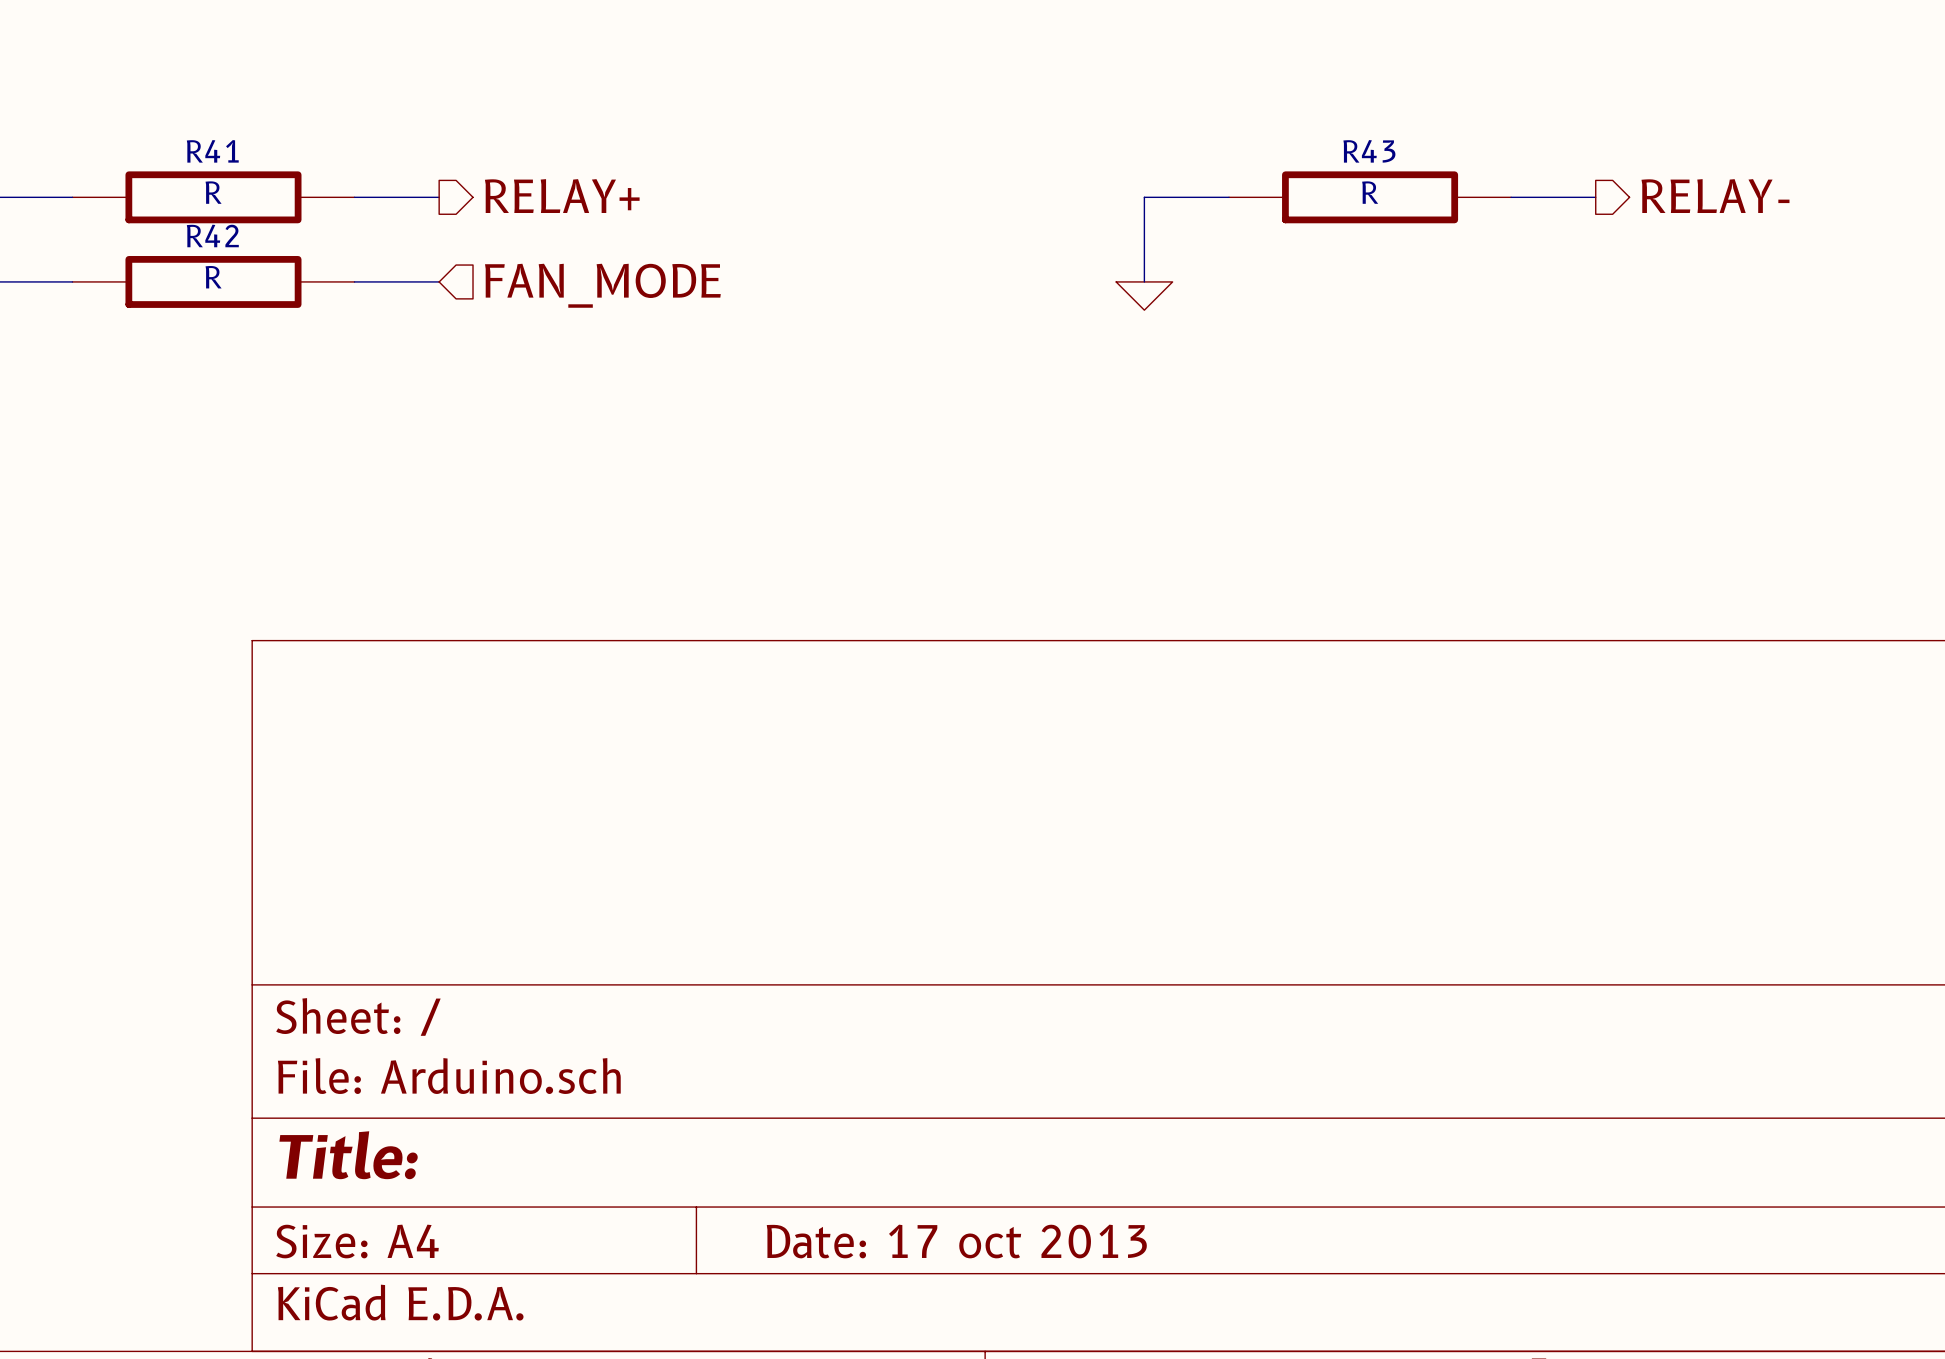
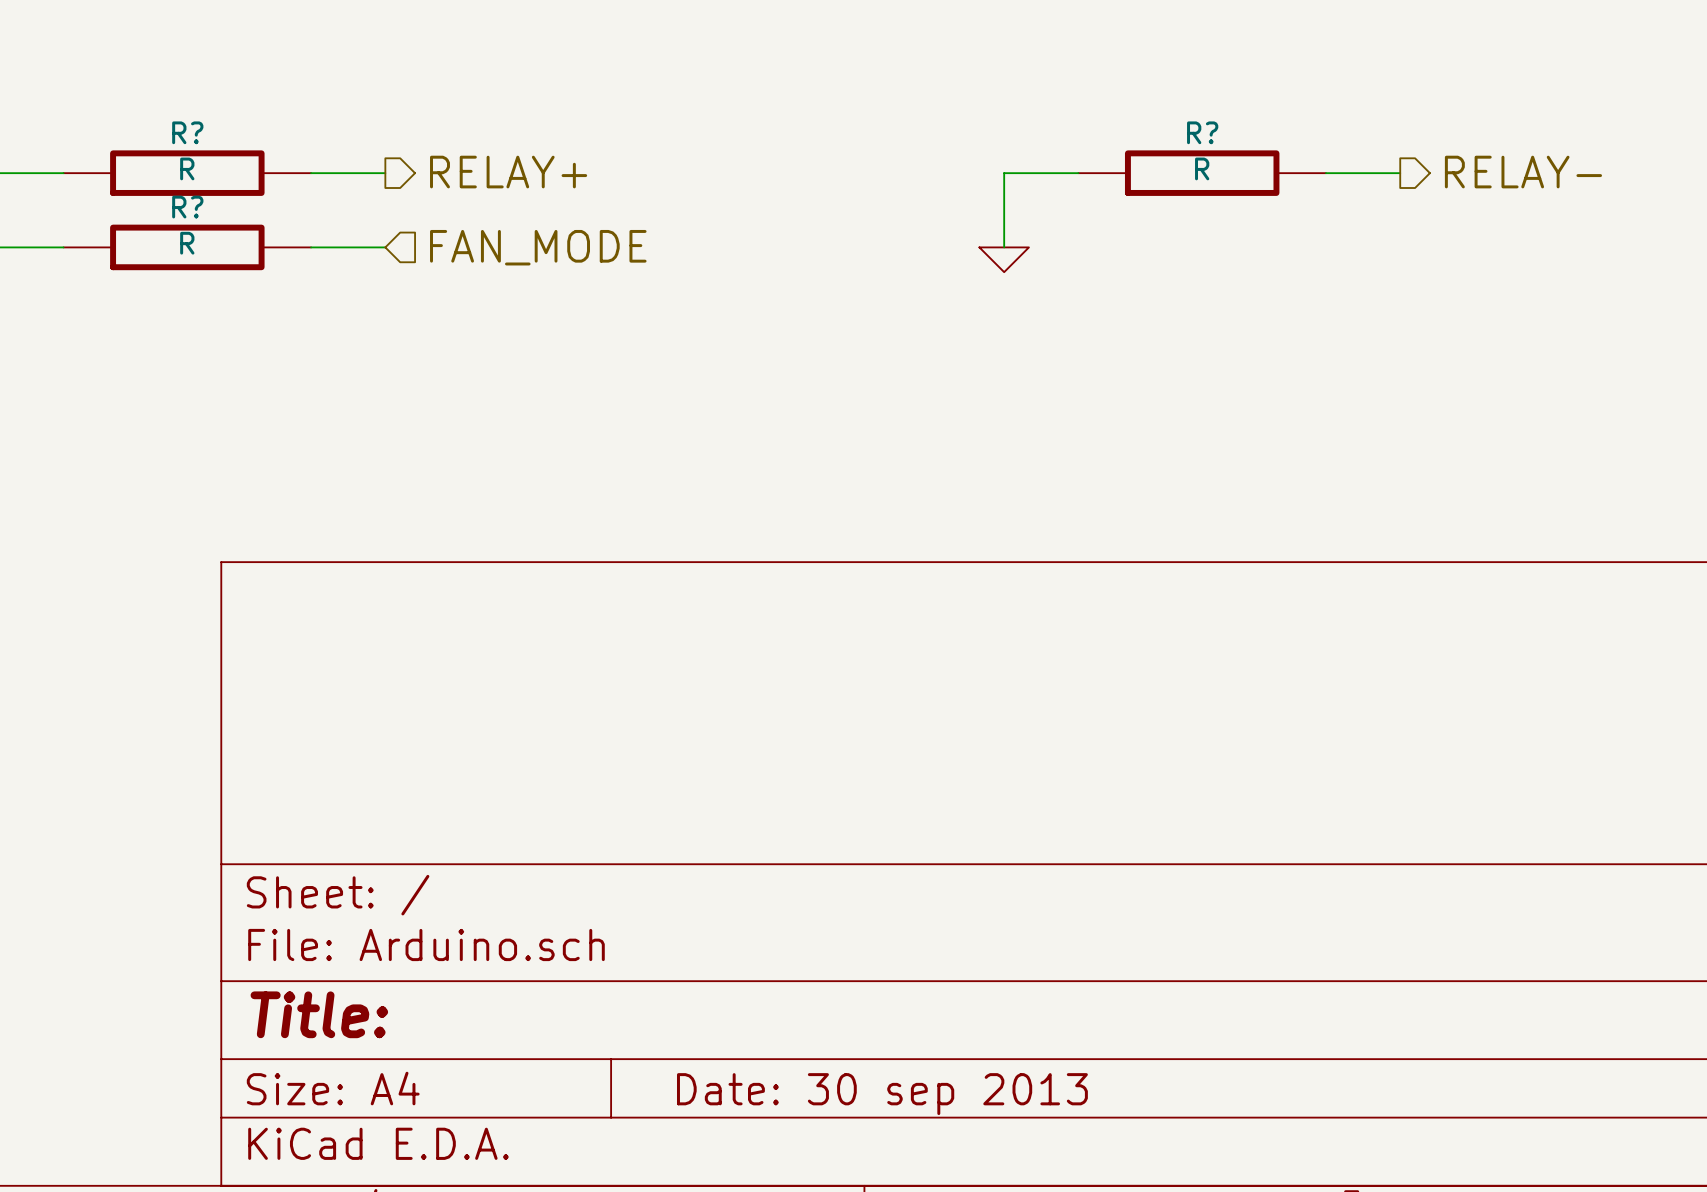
R41 name: R41 (212, 151) -> R? (187, 132)
R43 name: R43 (1369, 151) -> R? (1202, 132)
R42 name: R42 (212, 235) -> R? (187, 207)
title block: Date: 17 oct 2013 (956, 1241) -> Date: 30 sep 2013 (882, 1094)

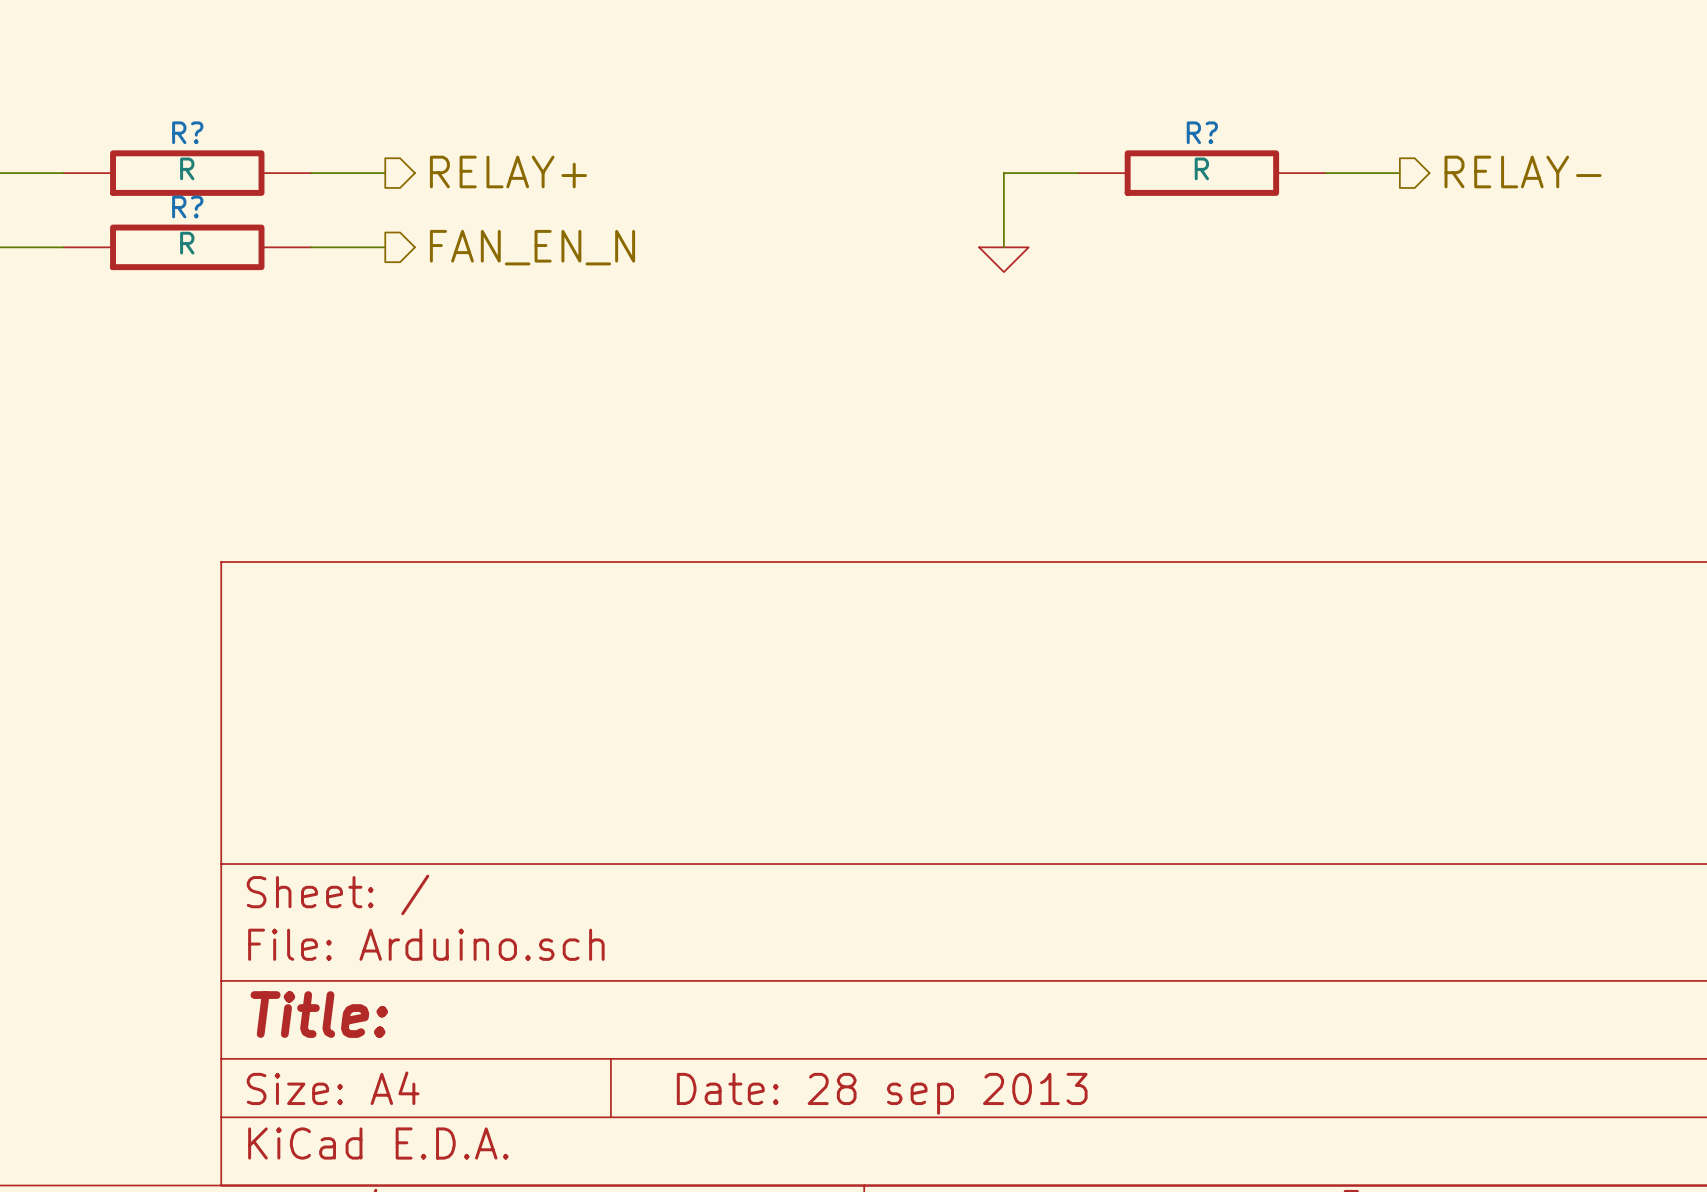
hierarchical label shape: input (538, 247) -> output (532, 247)
hierarchical label: FAN_MODE (538, 247) -> FAN_EN_N (532, 247)
title block: Date: 30 sep 2013 (882, 1094) -> Date: 28 sep 2013 (882, 1093)

